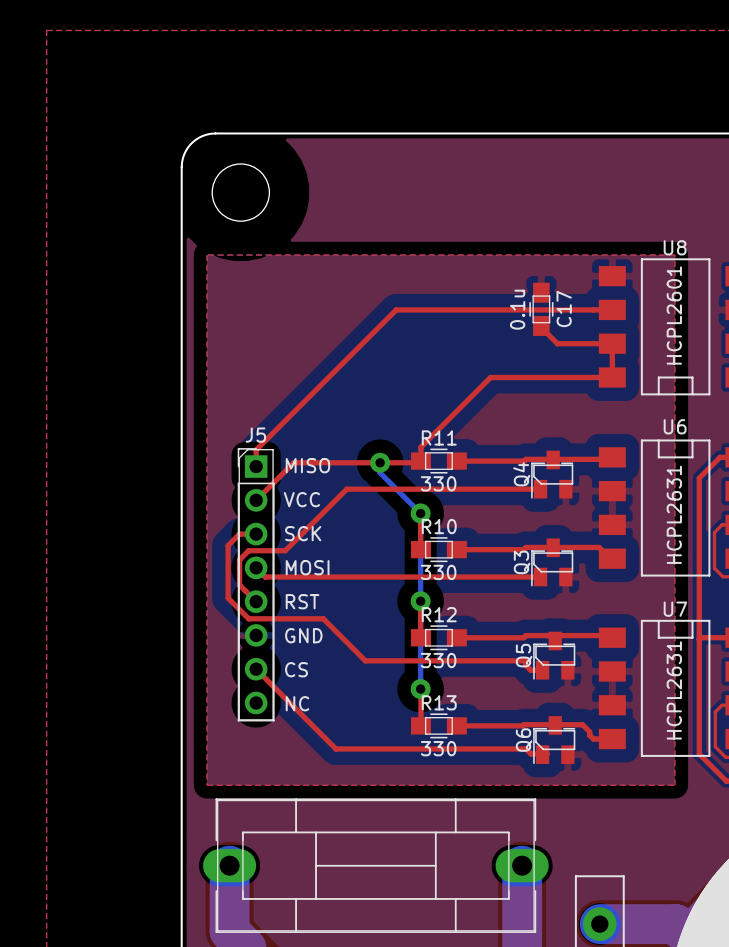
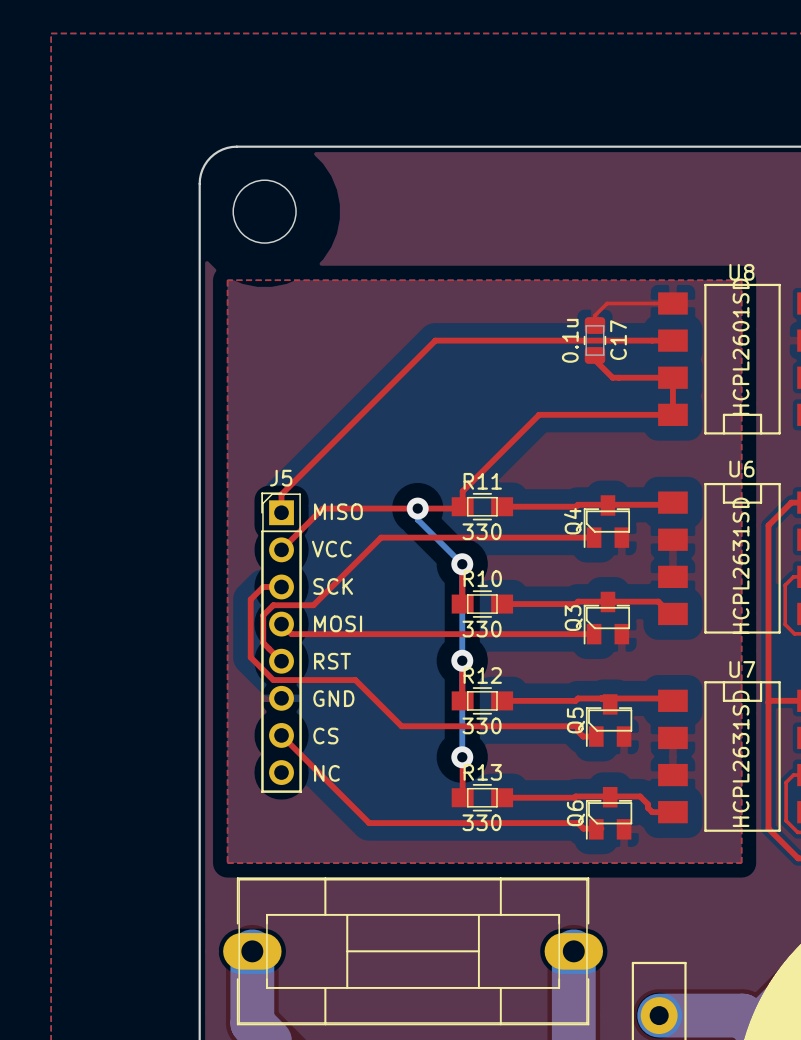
top track: none -> (672, 303) (607, 303) (594, 315) (594, 325)
C17 footprint: [529, 282, 554, 336] -> [583, 317, 607, 364]
U8 value: HCPL2601 (674, 315) -> HCPL2601SD (741, 346)
U6 value: HCPL2631 (674, 514) -> HCPL2631SD (741, 565)
U7 value: HCPL2631 (674, 690) -> HCPL2631SD (741, 758)

